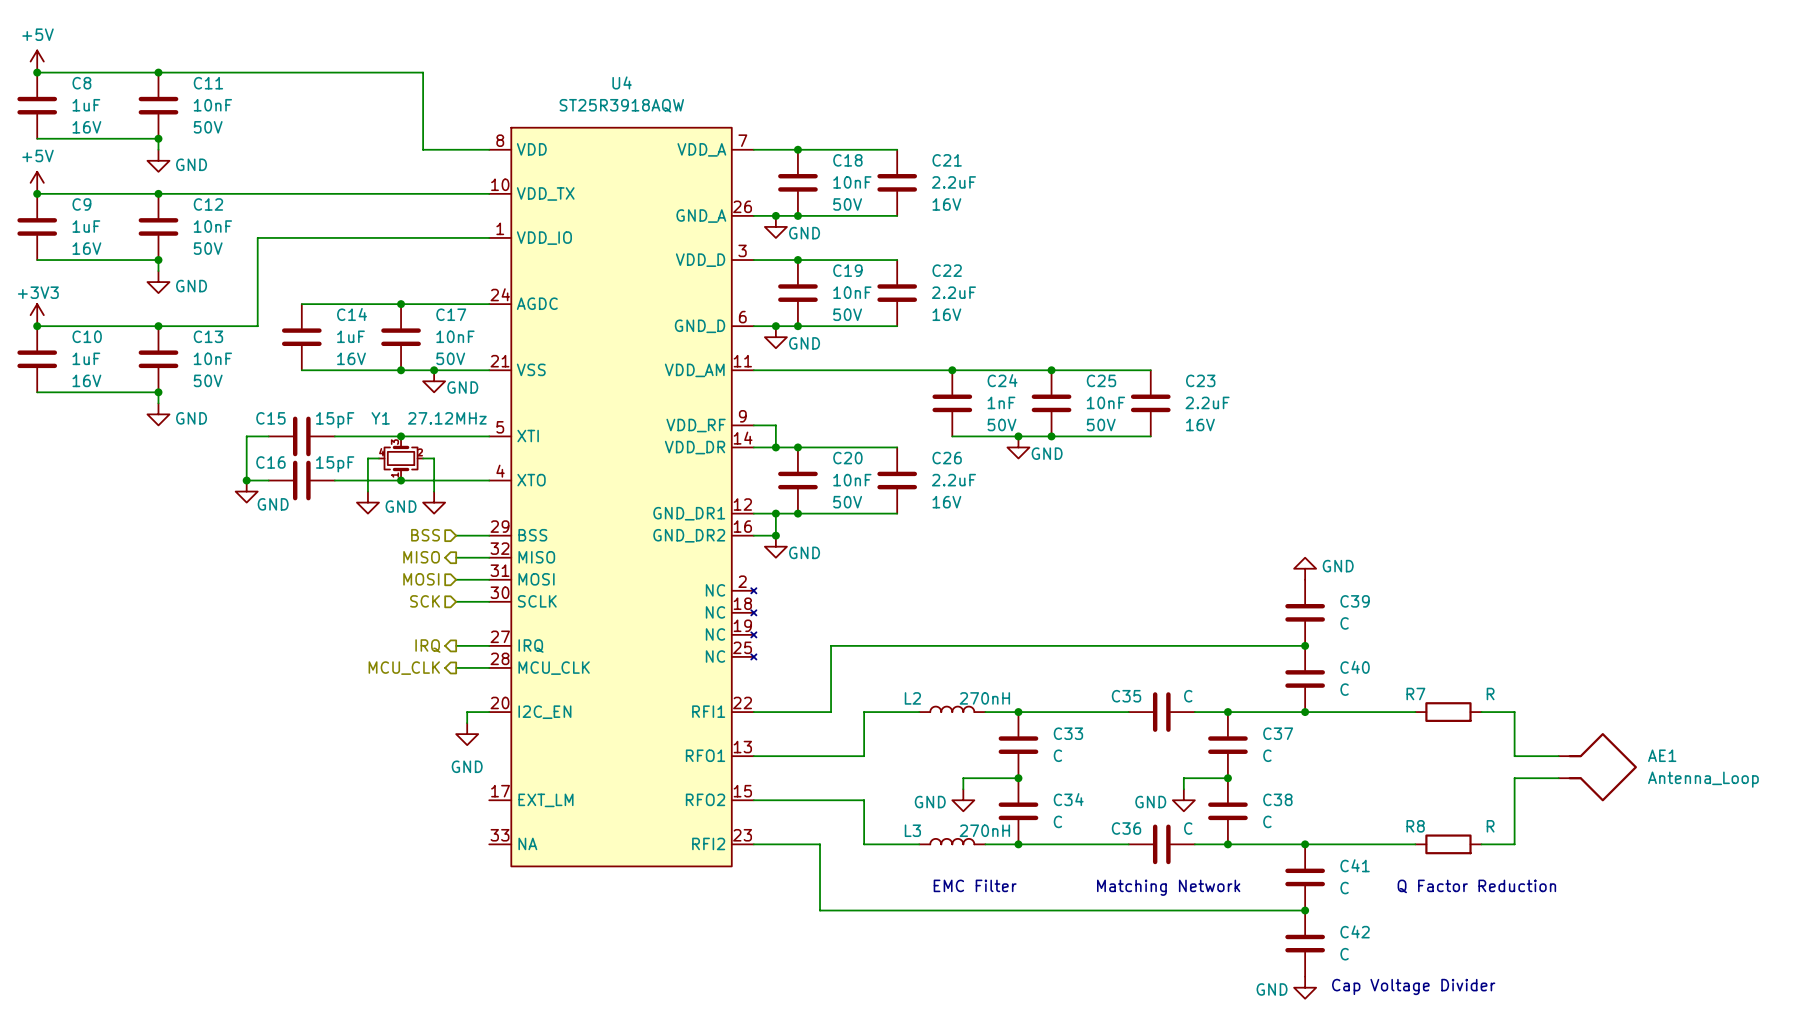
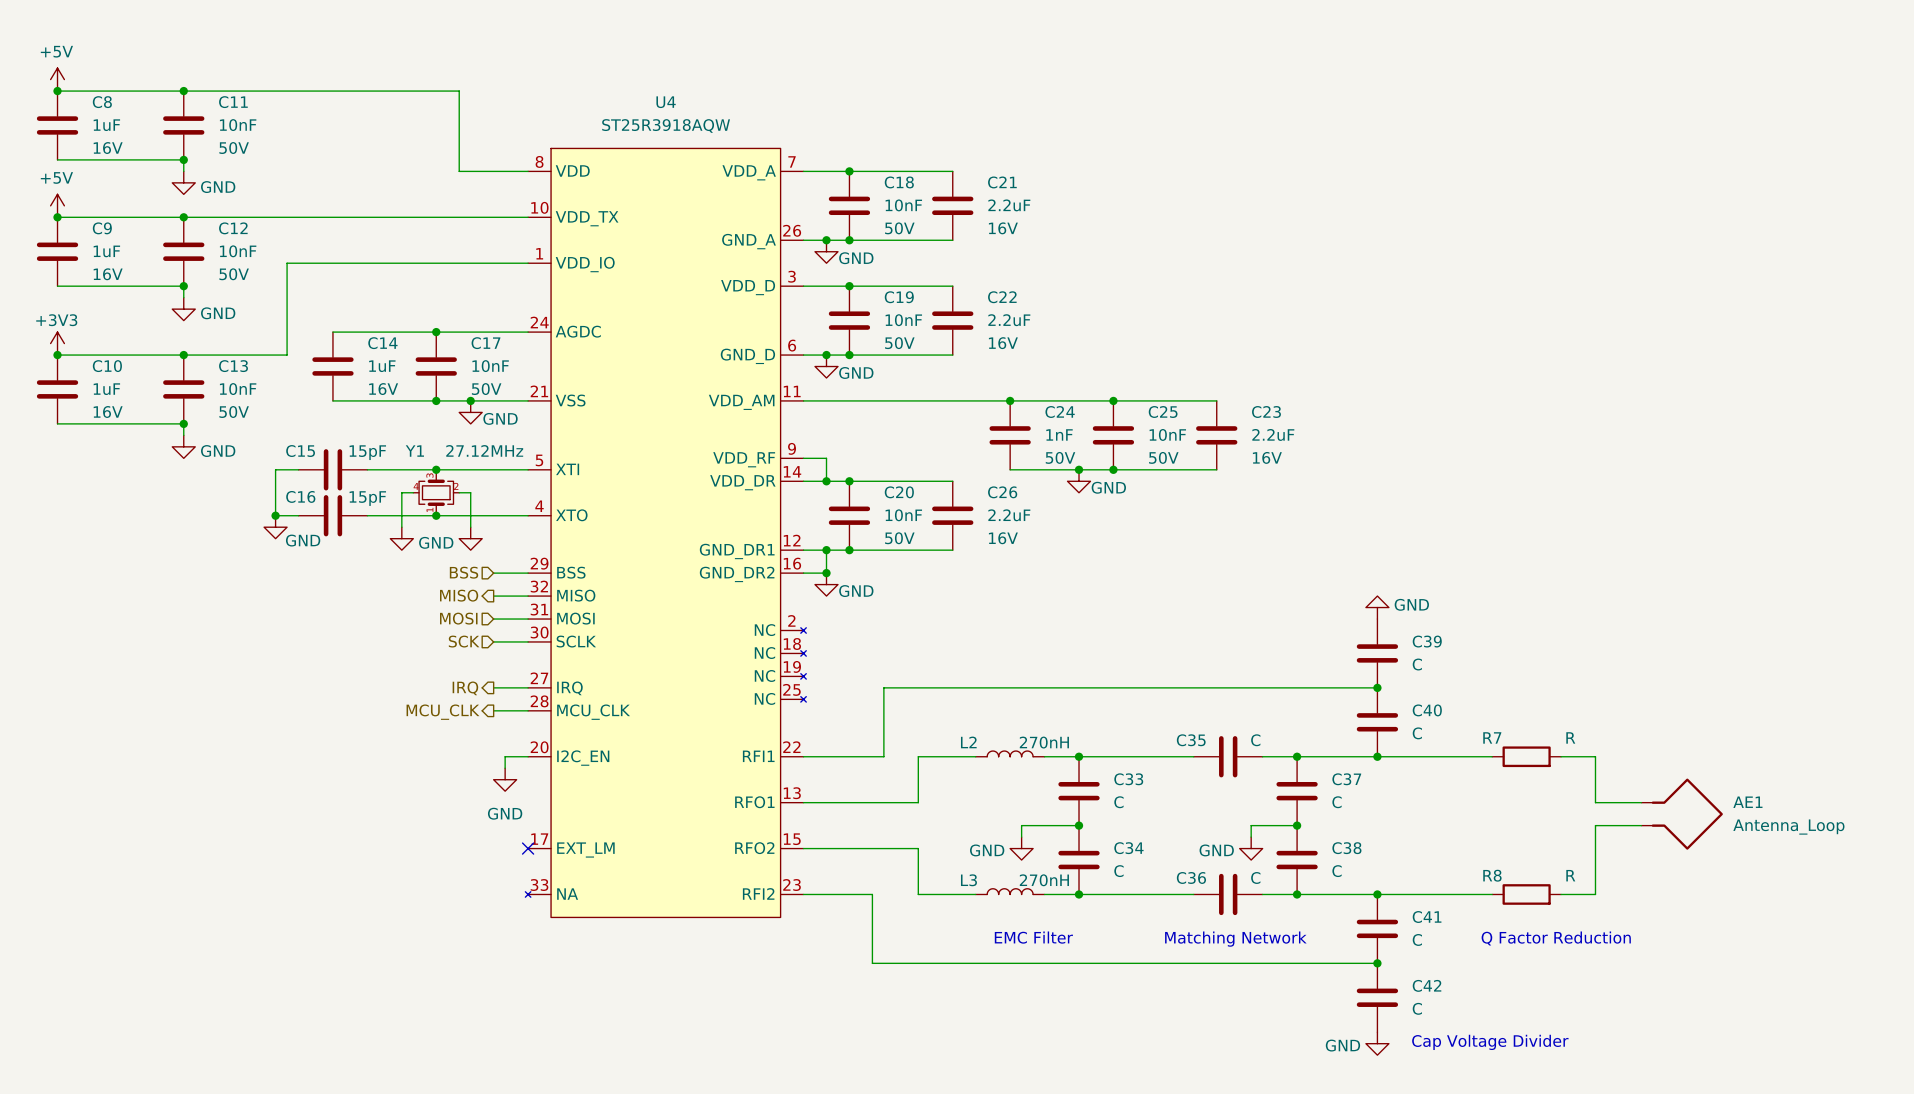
U4 symbol: [489, 127, 757, 867] -> [525, 148, 807, 918]
no-connect mark: none -> (528, 848)

